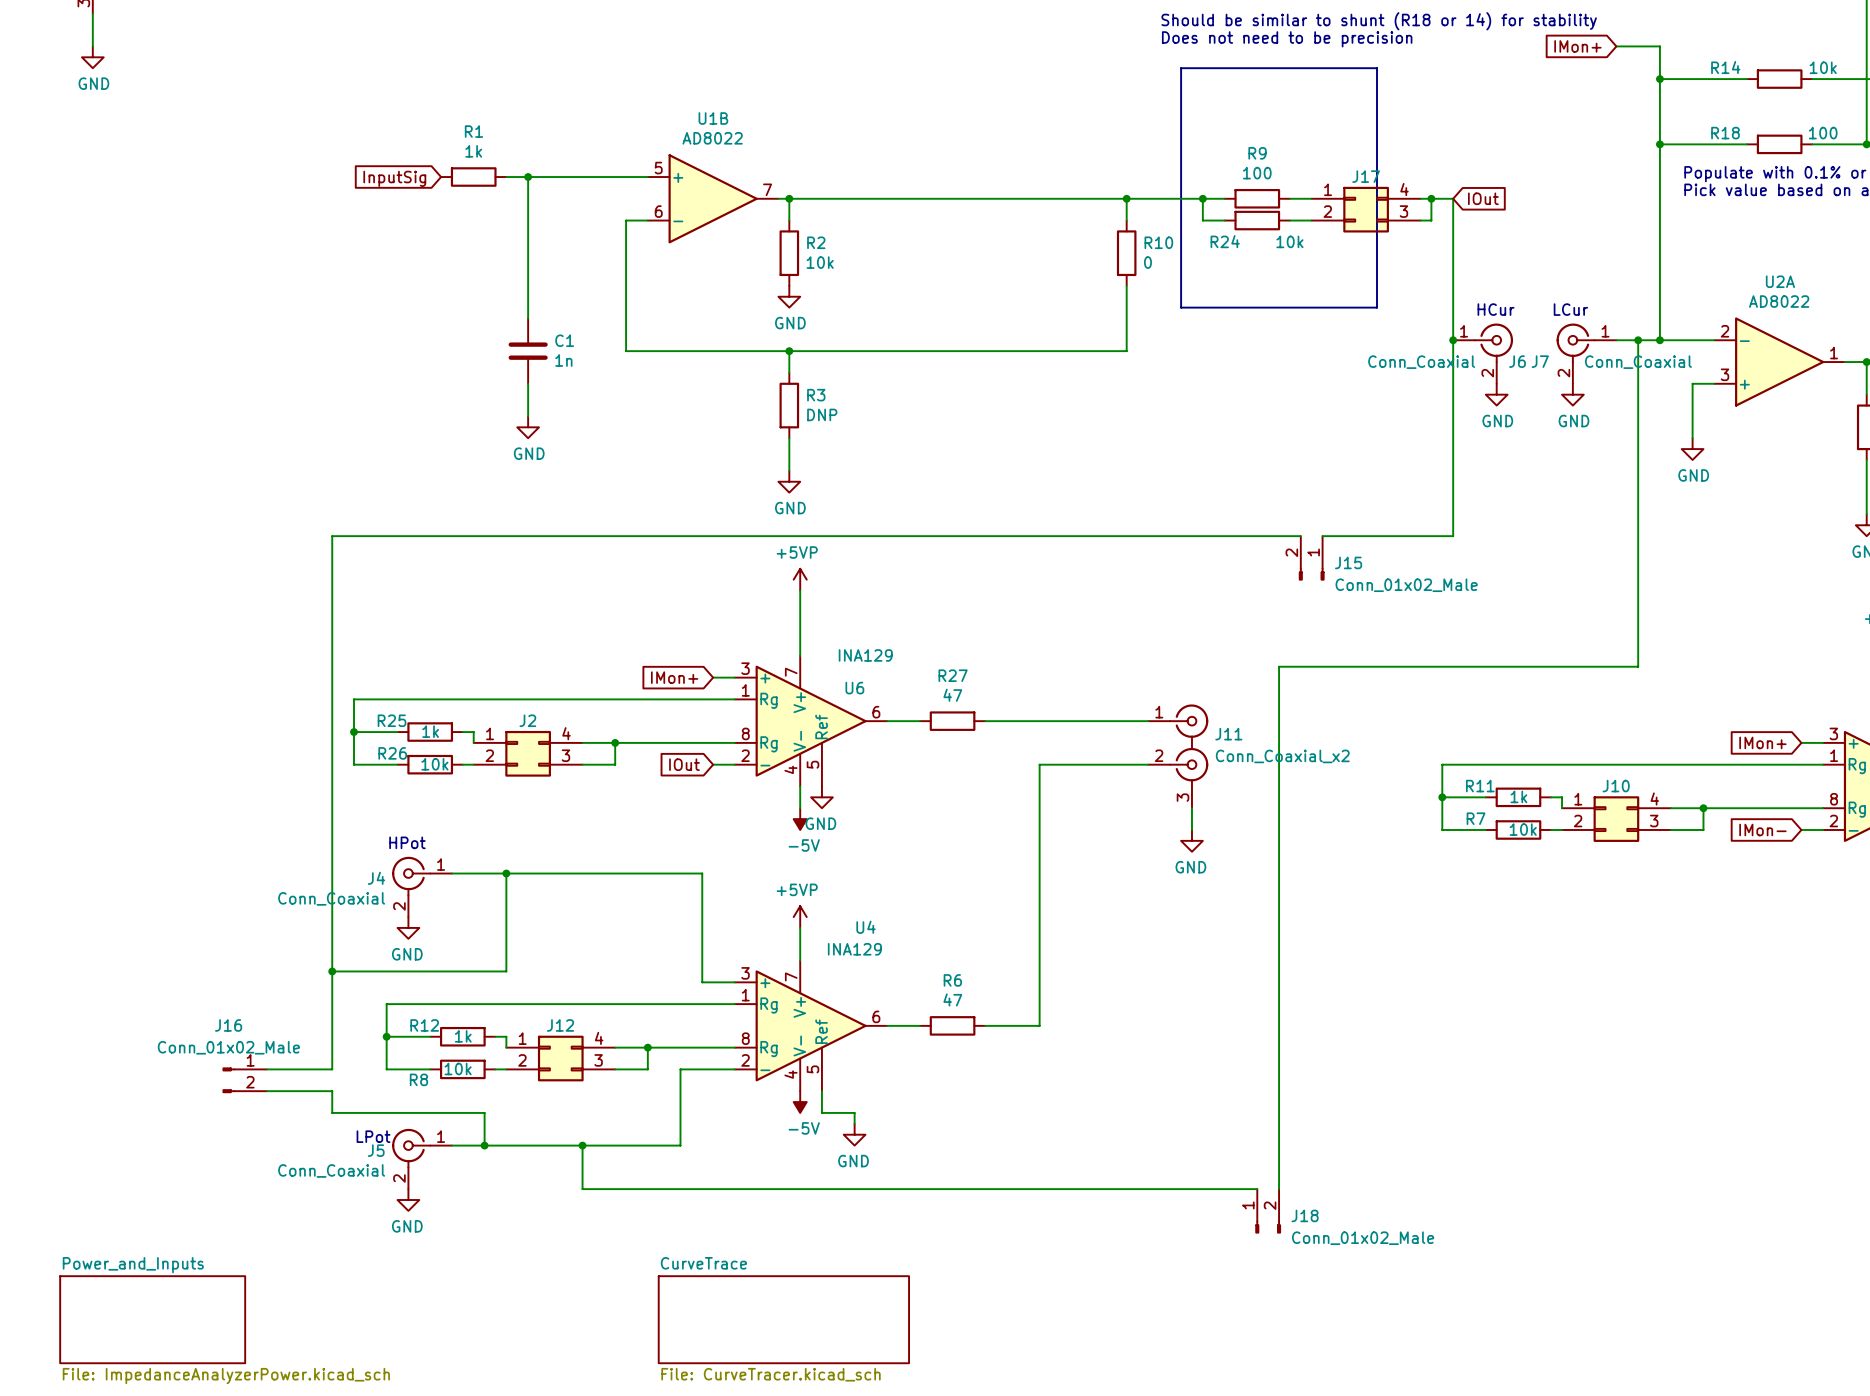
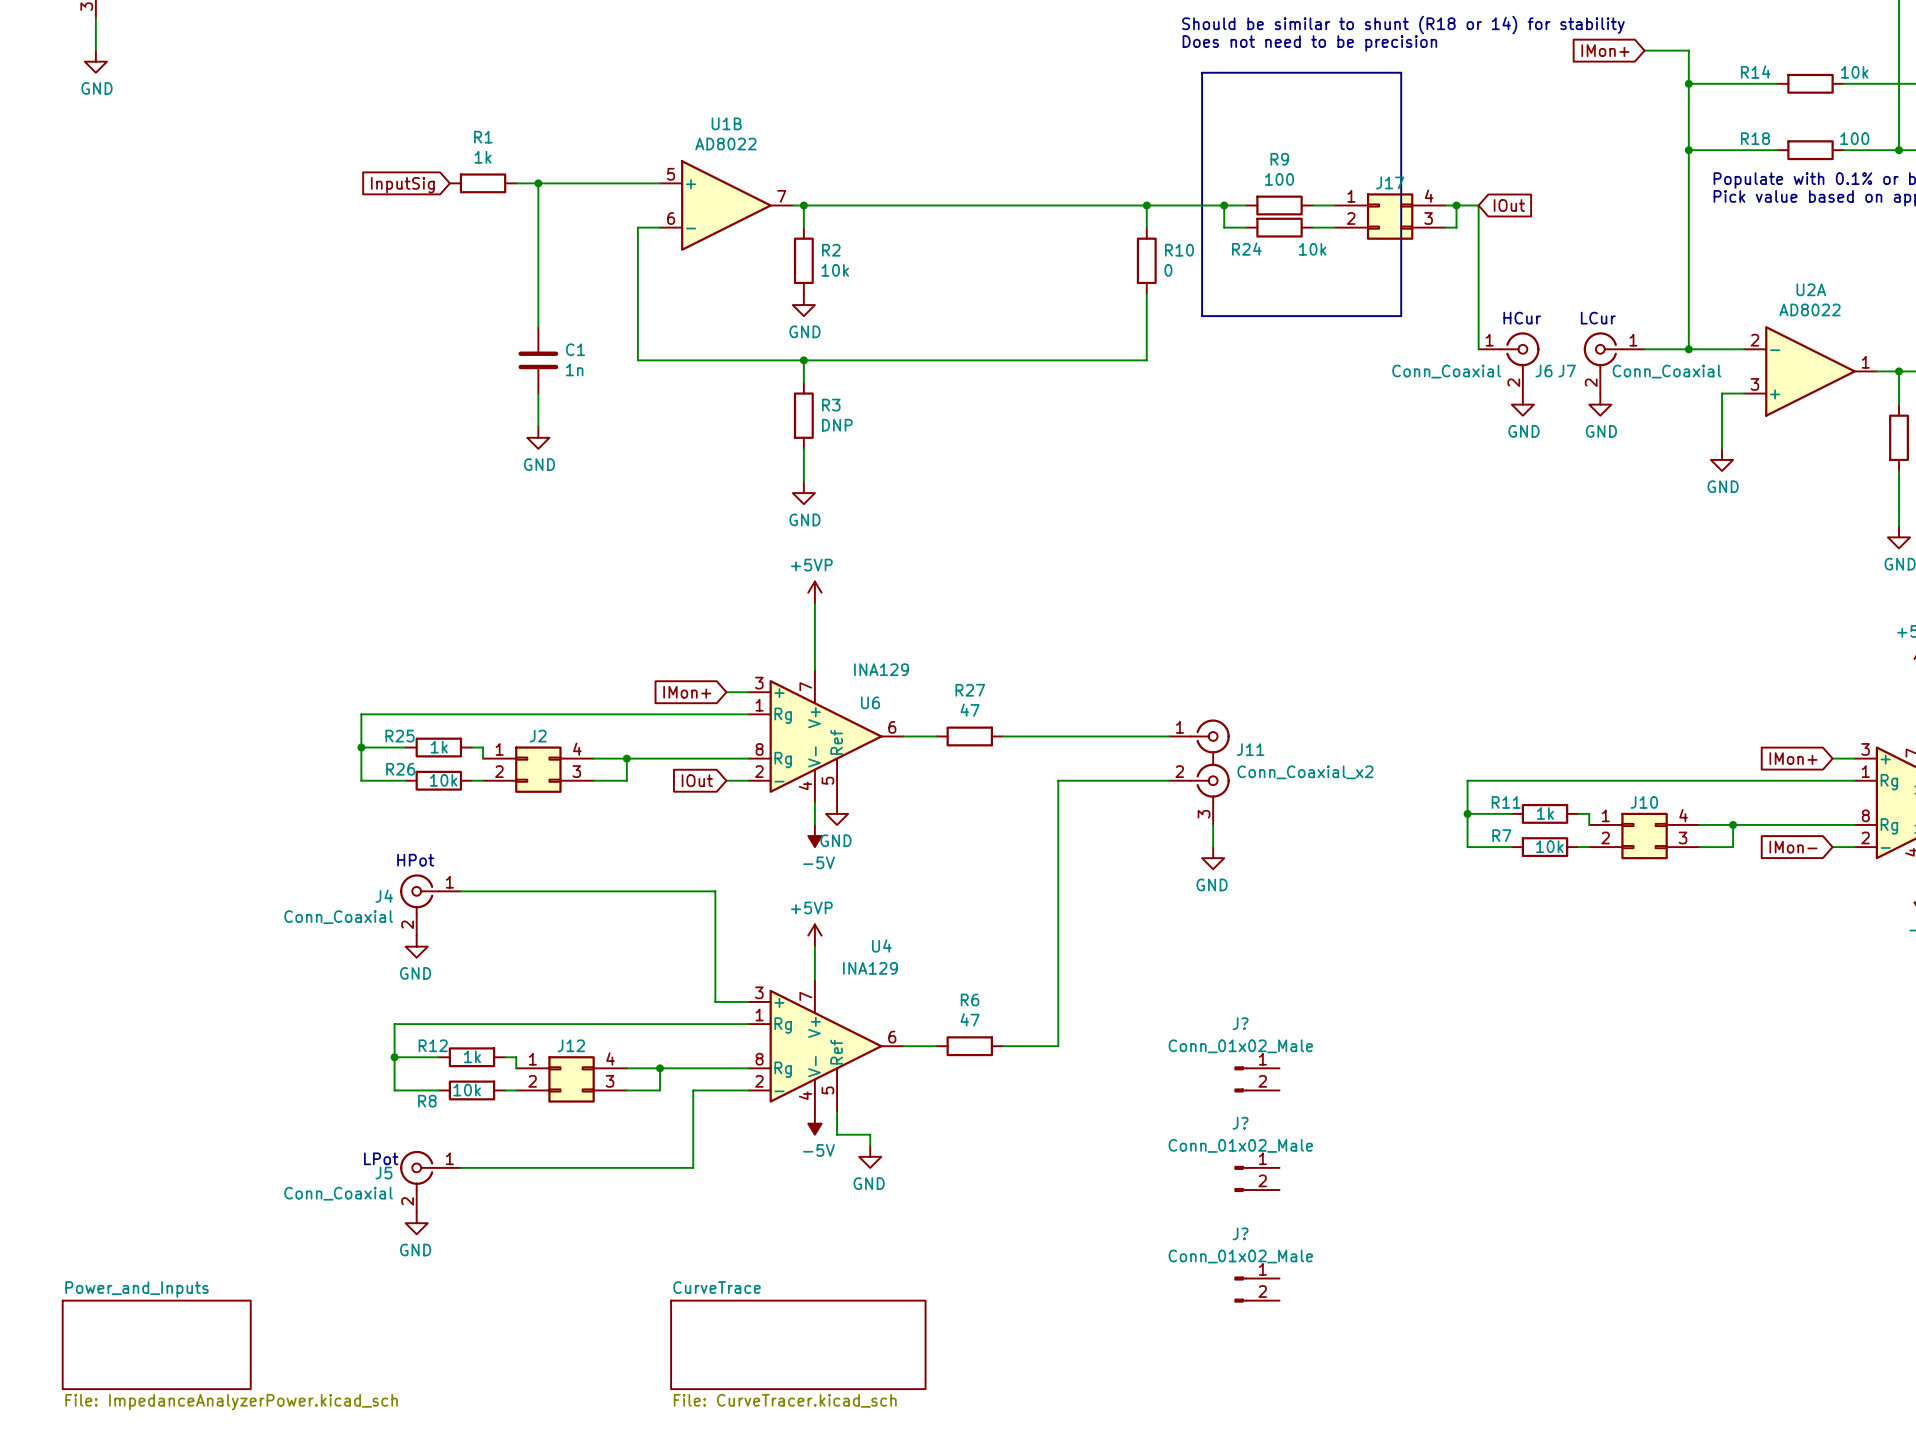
wire: (1453, 340) (1453, 536) (1322, 536) -> none
junction: (1453, 340) -> none
wire: (1638, 340) (1638, 666) (1279, 666) (1279, 1189) -> none
junction: (1638, 340) -> none
wire: (1300, 536) (332, 536) (332, 1069) (266, 1069) -> none
J15: Conn_01x02_Male (1311, 558) -> none
wire: (506, 873) (506, 971) (332, 971) -> none
junction: (506, 873) -> none
junction: (332, 971) -> none
J?: none -> Conn_01x02_Male (1257, 1079)
J16: Conn_01x02_Male (244, 1080) -> none
wire: (266, 1091) (332, 1091) (332, 1112) (484, 1112) (484, 1145) -> none
junction: (484, 1145) -> none
wire: (582, 1145) (582, 1189) (1257, 1189) -> none
junction: (582, 1145) -> none
J?: none -> Conn_01x02_Male (1257, 1178)
J18: Conn_01x02_Male (1268, 1211) -> none
J?: none -> Conn_01x02_Male (1257, 1289)

